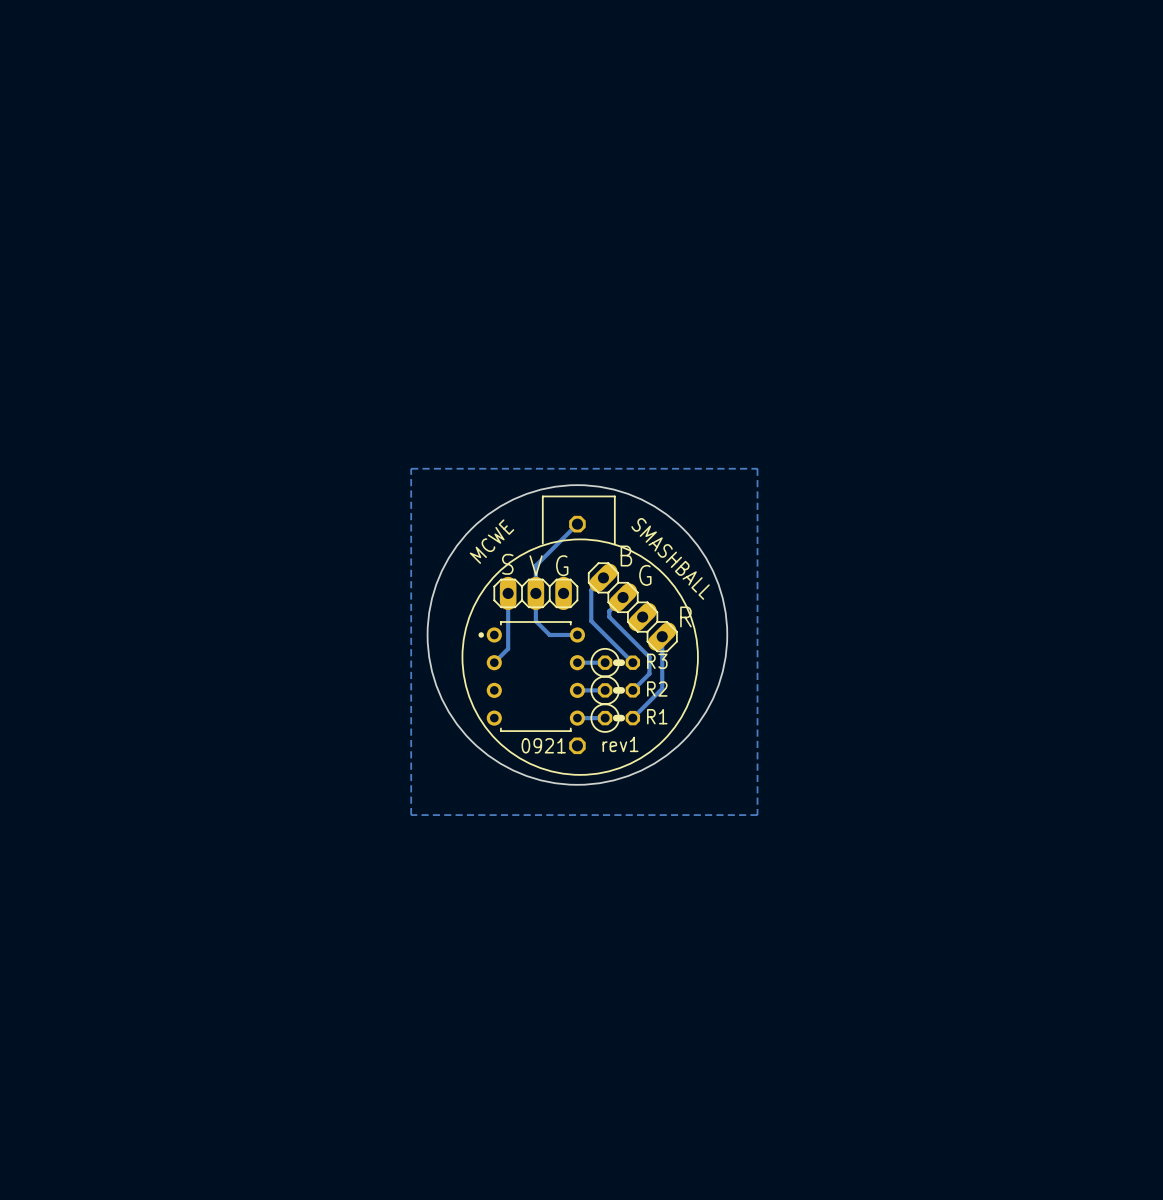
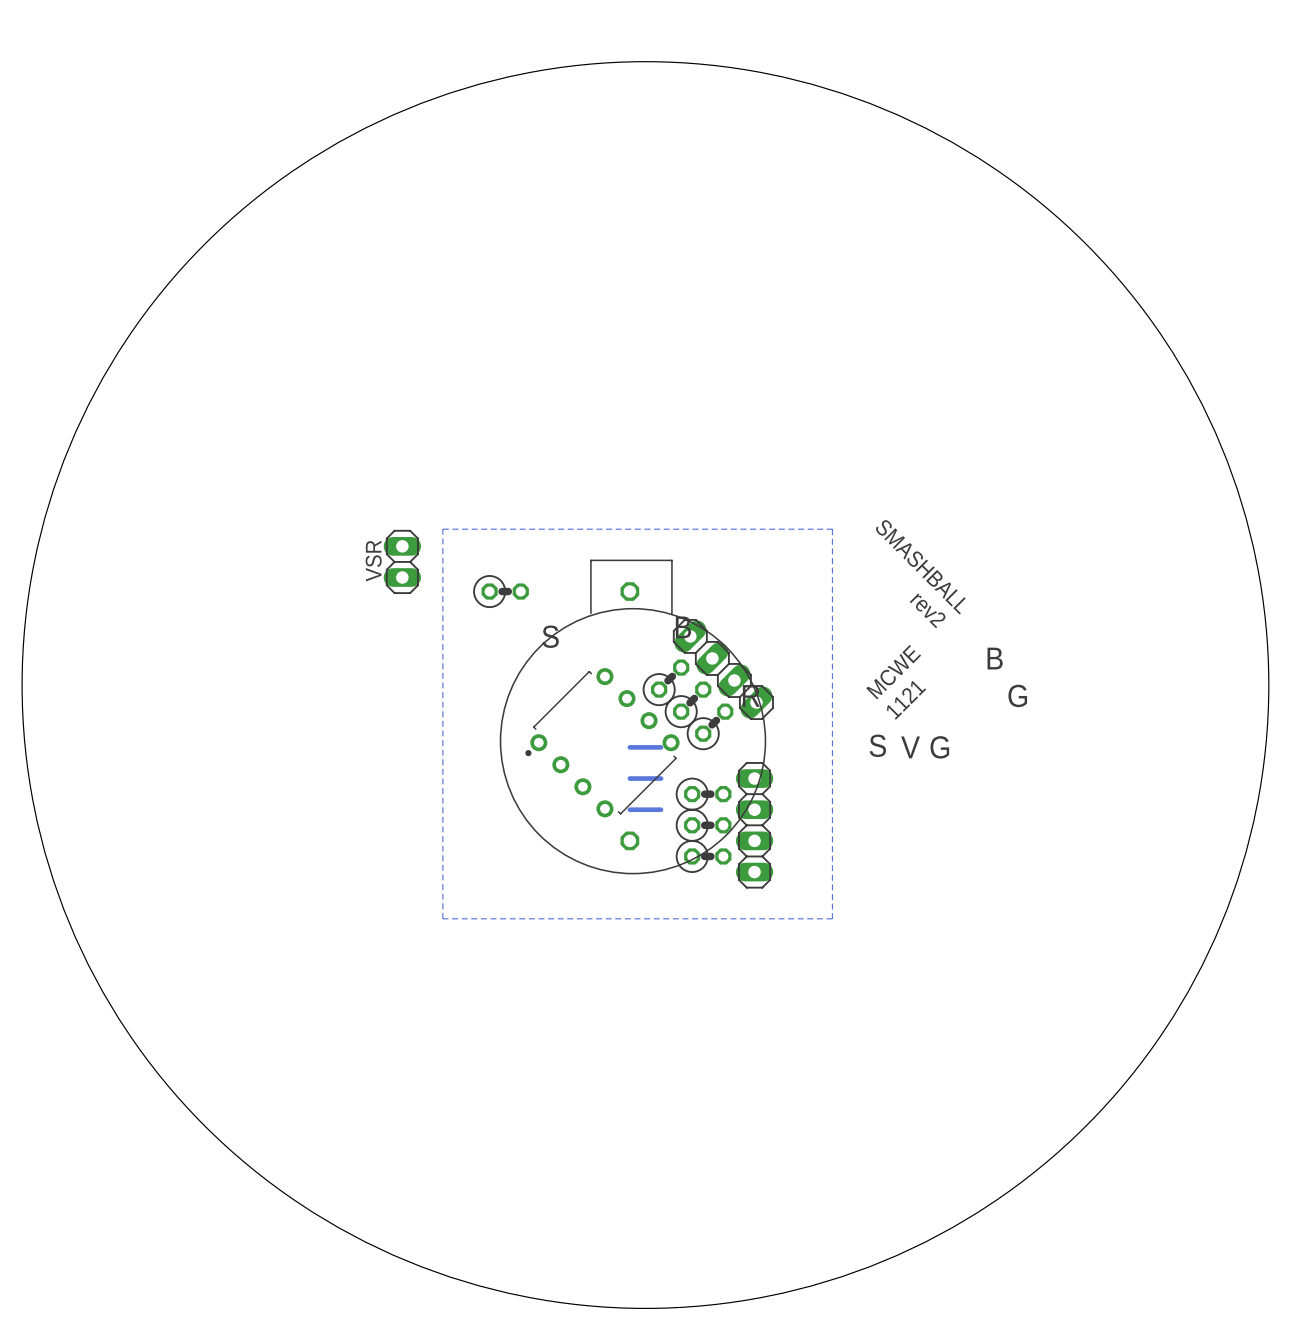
round board edge: none -> [21, 61, 1269, 1309]
round board edge: [427, 484, 728, 785] -> none
VSR: none -> (402, 561)
part: none -> (500, 591)
bottom track: (577, 524) (535, 565) (535, 621) (549, 634) (577, 634) -> none
text: none -> rev2 (927, 610)
text: MCWE (491, 541) -> none
text position: SMASHBALL (670, 558) -> SMASHBALL (920, 567)
text: V (536, 565) -> none
text: G (562, 565) -> none
text: G (645, 575) -> none
bottom track: (603, 577) (591, 590) (591, 621) (632, 662) -> none
text: none -> B (995, 658)
bottom track: (508, 593) (508, 648) (494, 662) -> none
part: (535, 593) -> none
bottom track: (623, 597) (609, 611) (609, 616) (649, 657) (649, 673) (632, 690) -> none
text: none -> MCWE (893, 672)
part: none -> (665, 682)
part position: (632, 607) -> (723, 669)
text: none -> G (1017, 695)
text: none -> 1121 (906, 700)
part: none -> (688, 704)
bottom track: (662, 636) (662, 688) (632, 718) -> none
part: none -> (710, 726)
part: none -> (602, 742)
text: none -> S (877, 745)
R3: (615, 662) -> none
text: none -> V (910, 747)
text: none -> G (939, 747)
part: (531, 676) -> none
R2: (615, 690) -> none
part: none -> (703, 794)
R1: (615, 718) -> none
part: none -> (703, 825)
part: none -> (754, 825)
text: rev1 (620, 744) -> none
text: 0921 (543, 745) -> none
part: none -> (703, 856)

